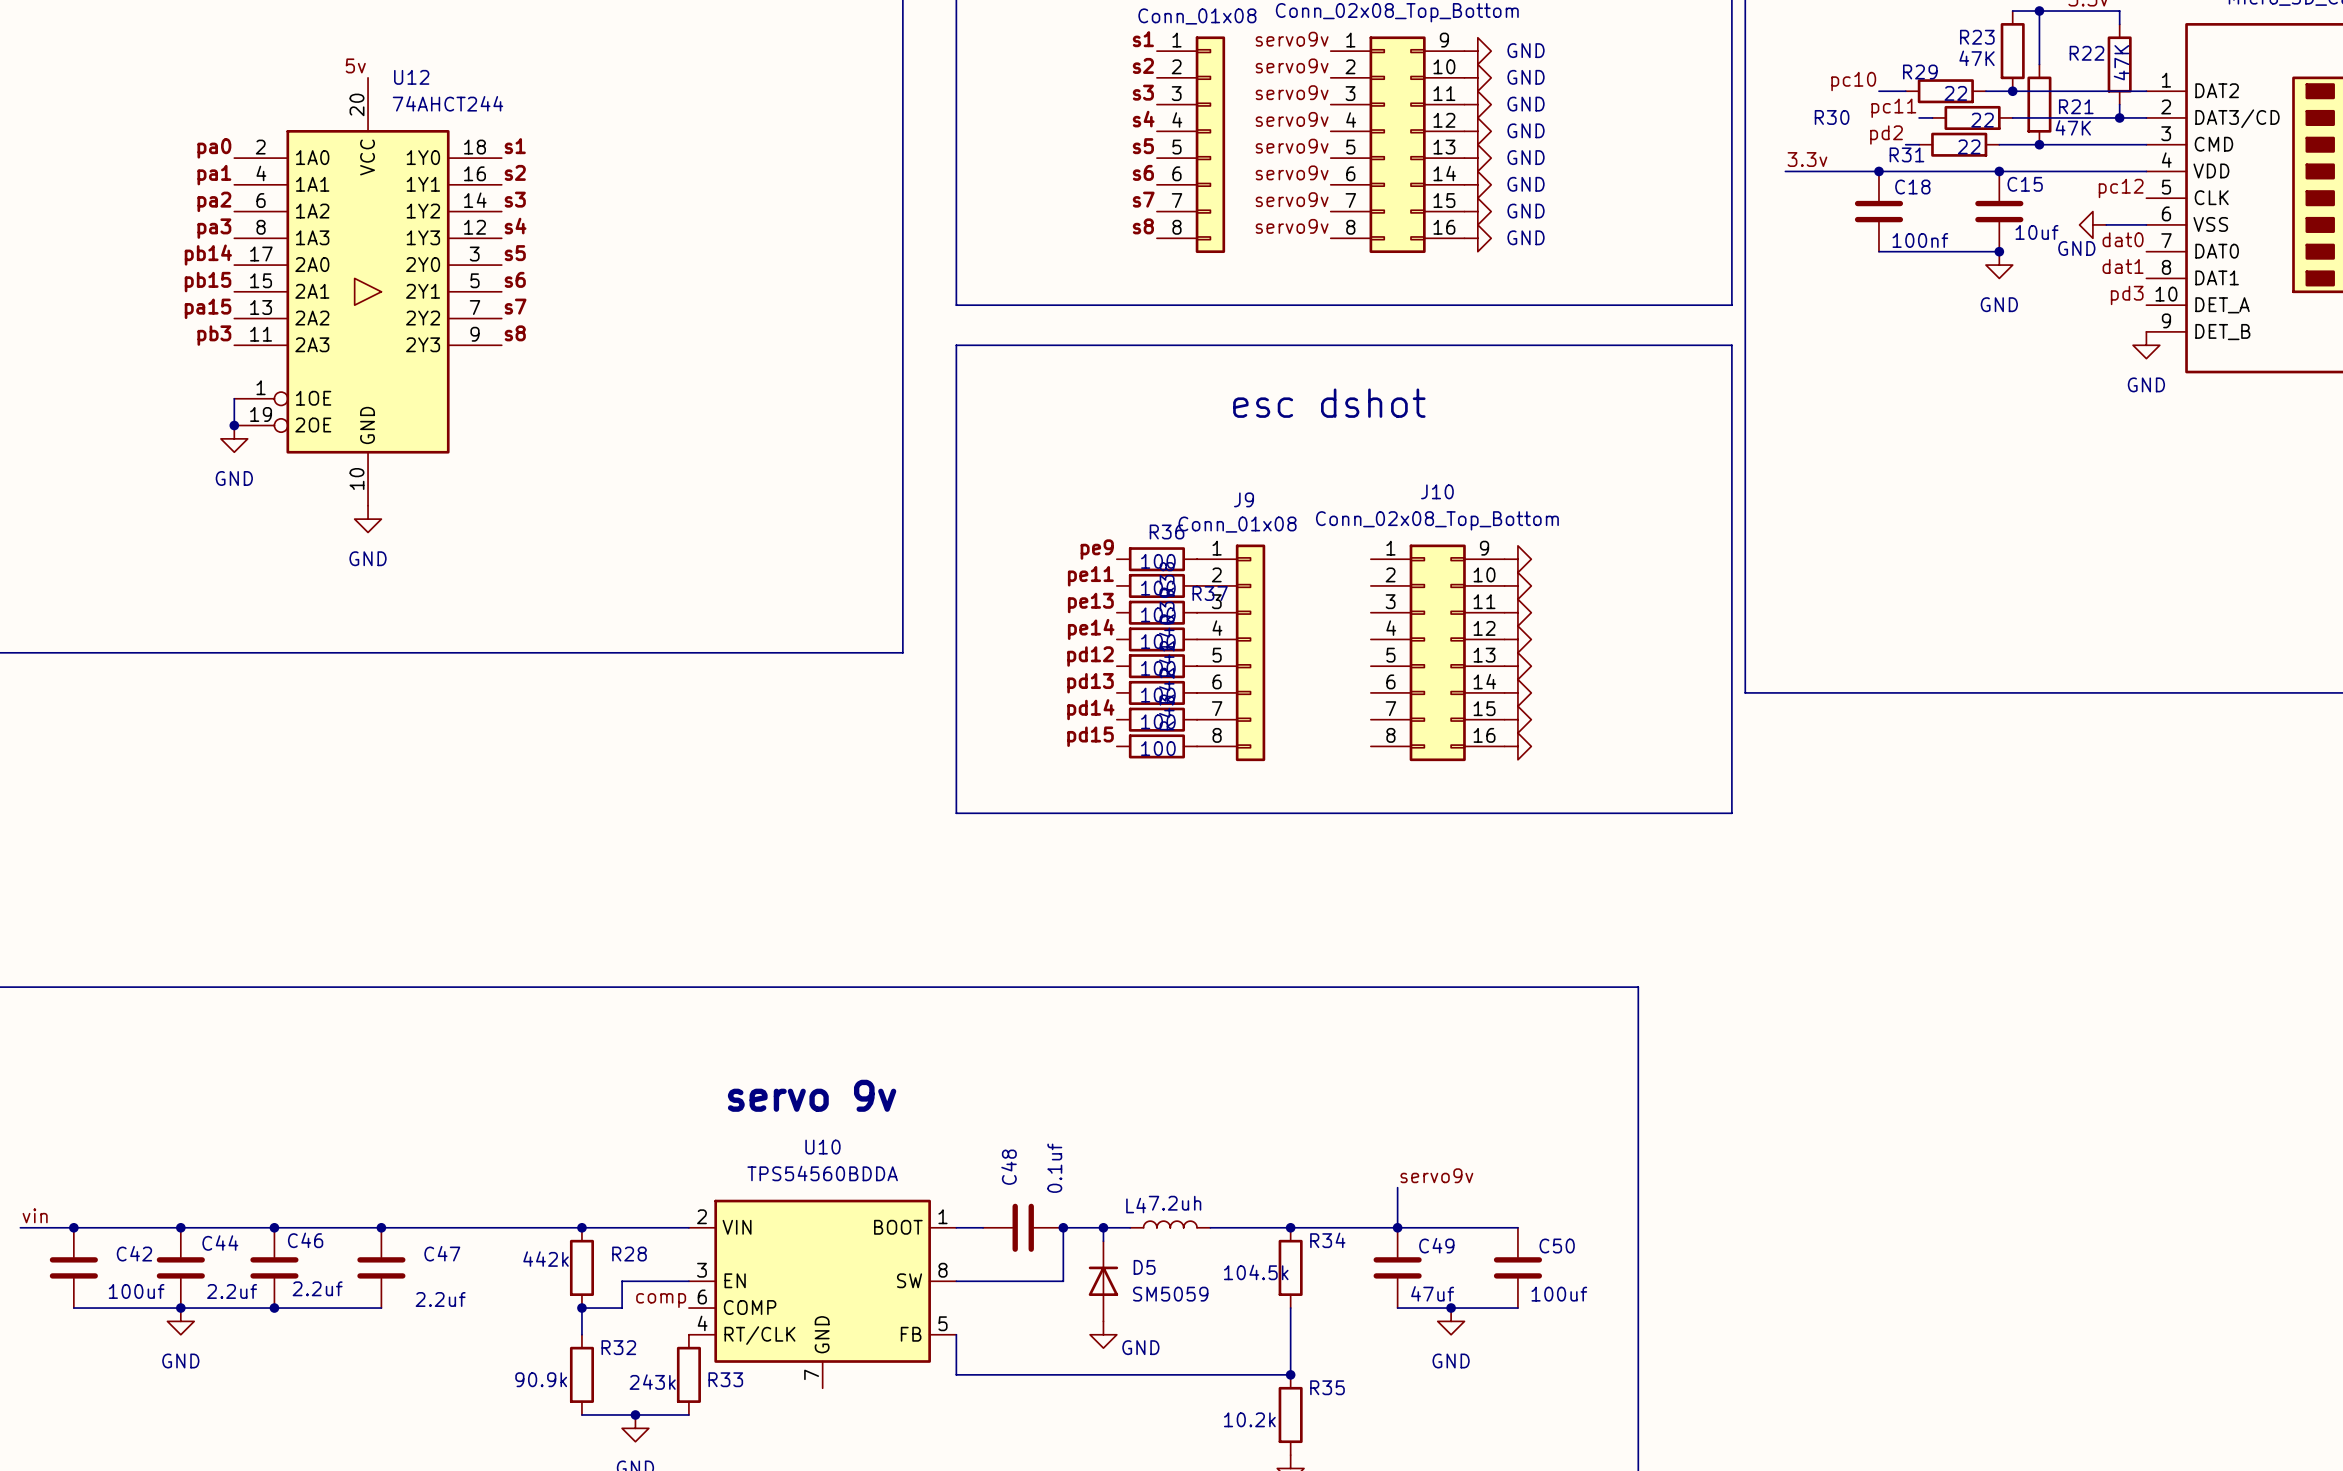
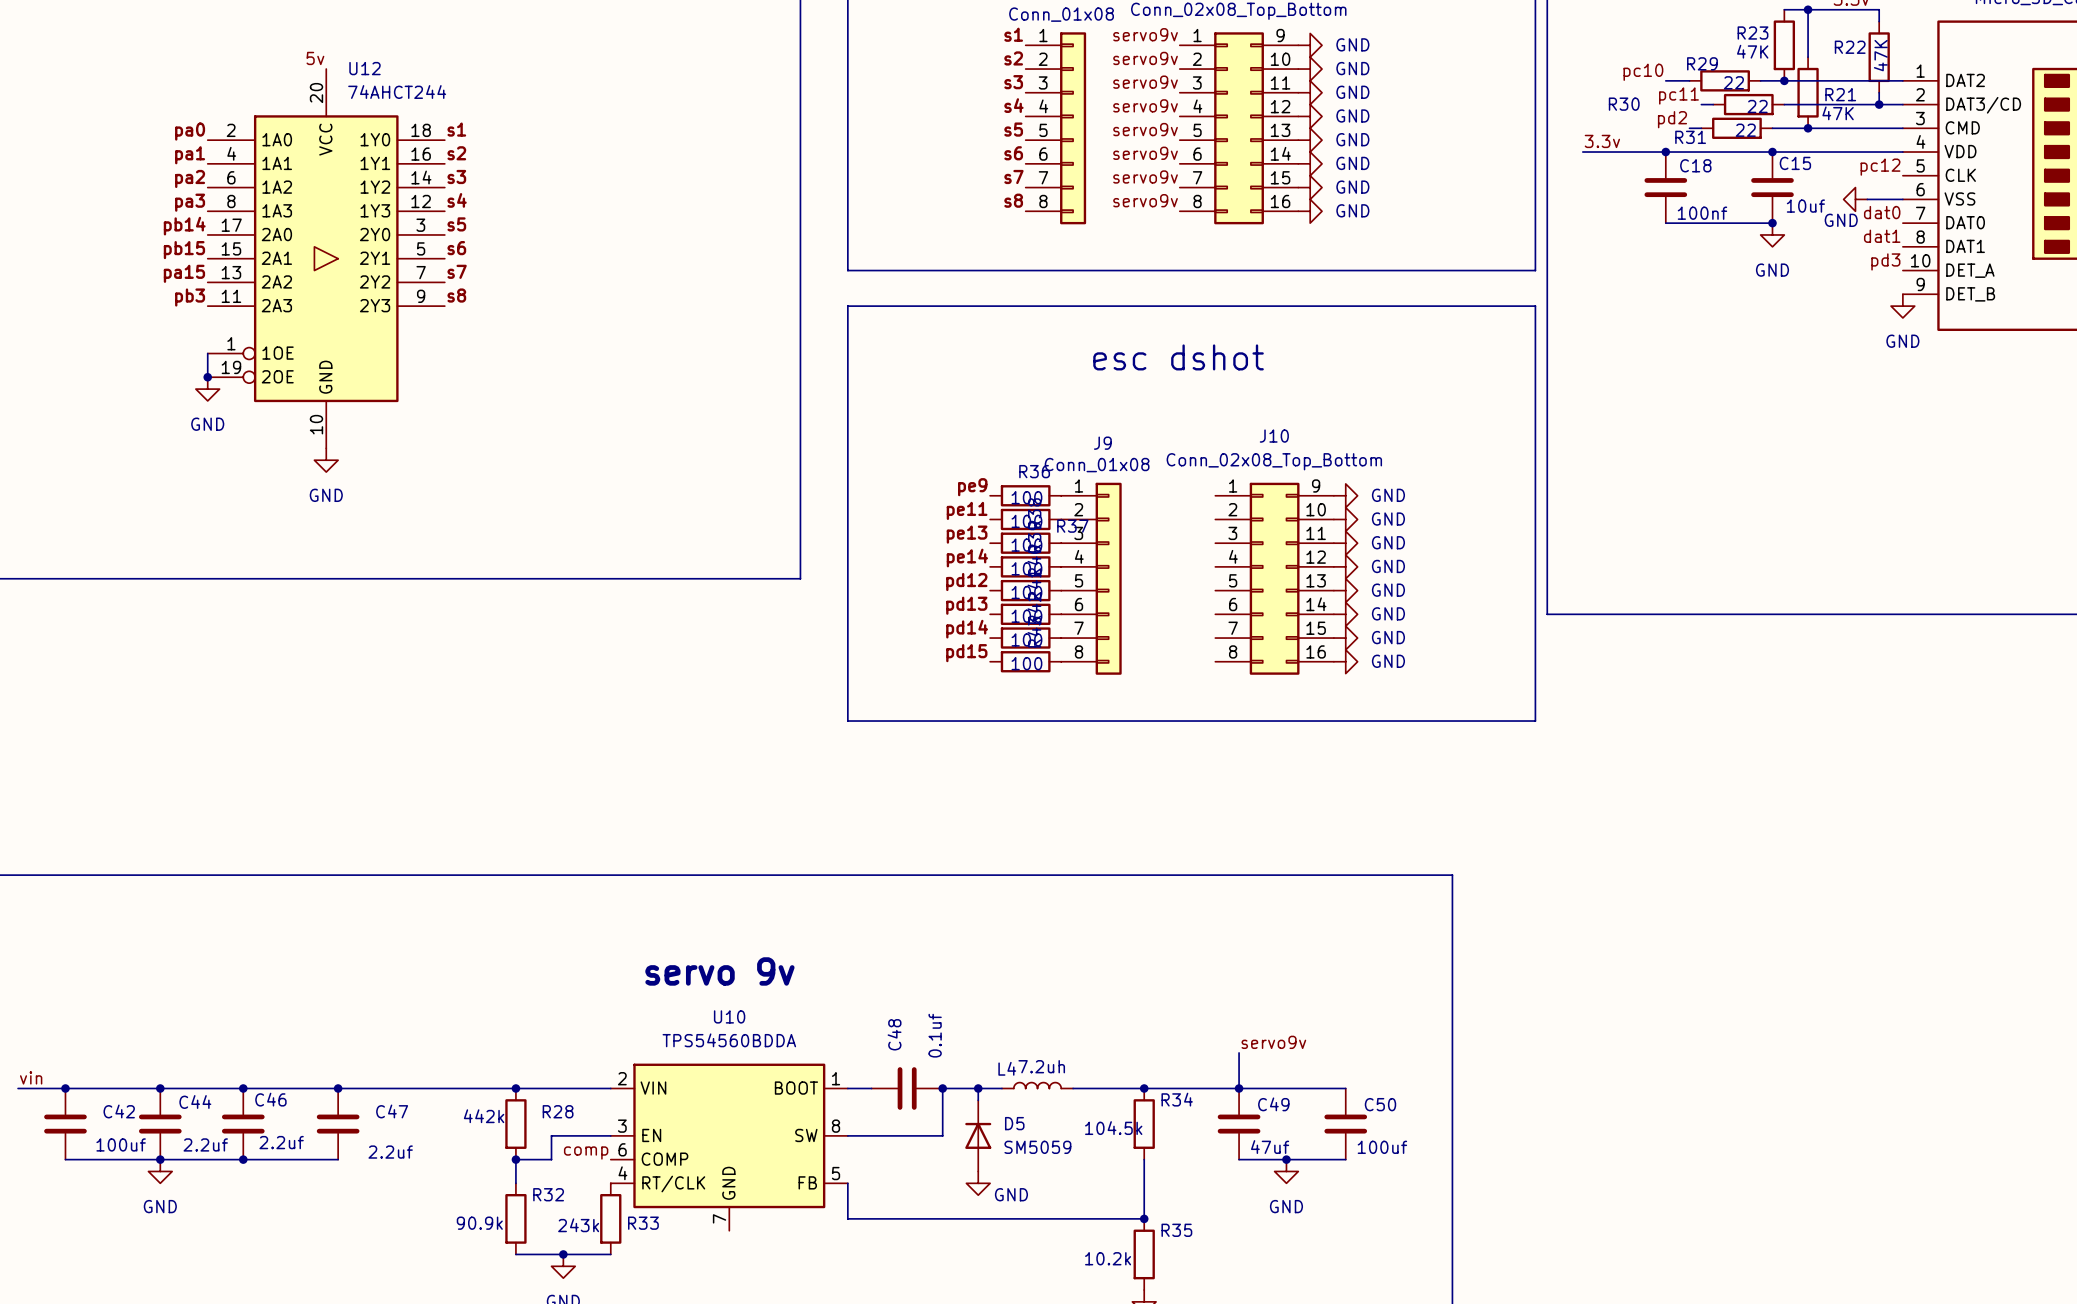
power symbol text: none -> GND (1388, 495)
power symbol text: none -> GND (1388, 519)
power symbol text: none -> GND (1388, 542)
power symbol text: none -> GND (1388, 566)
power symbol text: none -> GND (1388, 590)
power symbol text: none -> GND (1388, 613)
power symbol text: none -> GND (1388, 637)
power symbol text: none -> GND (1388, 661)

